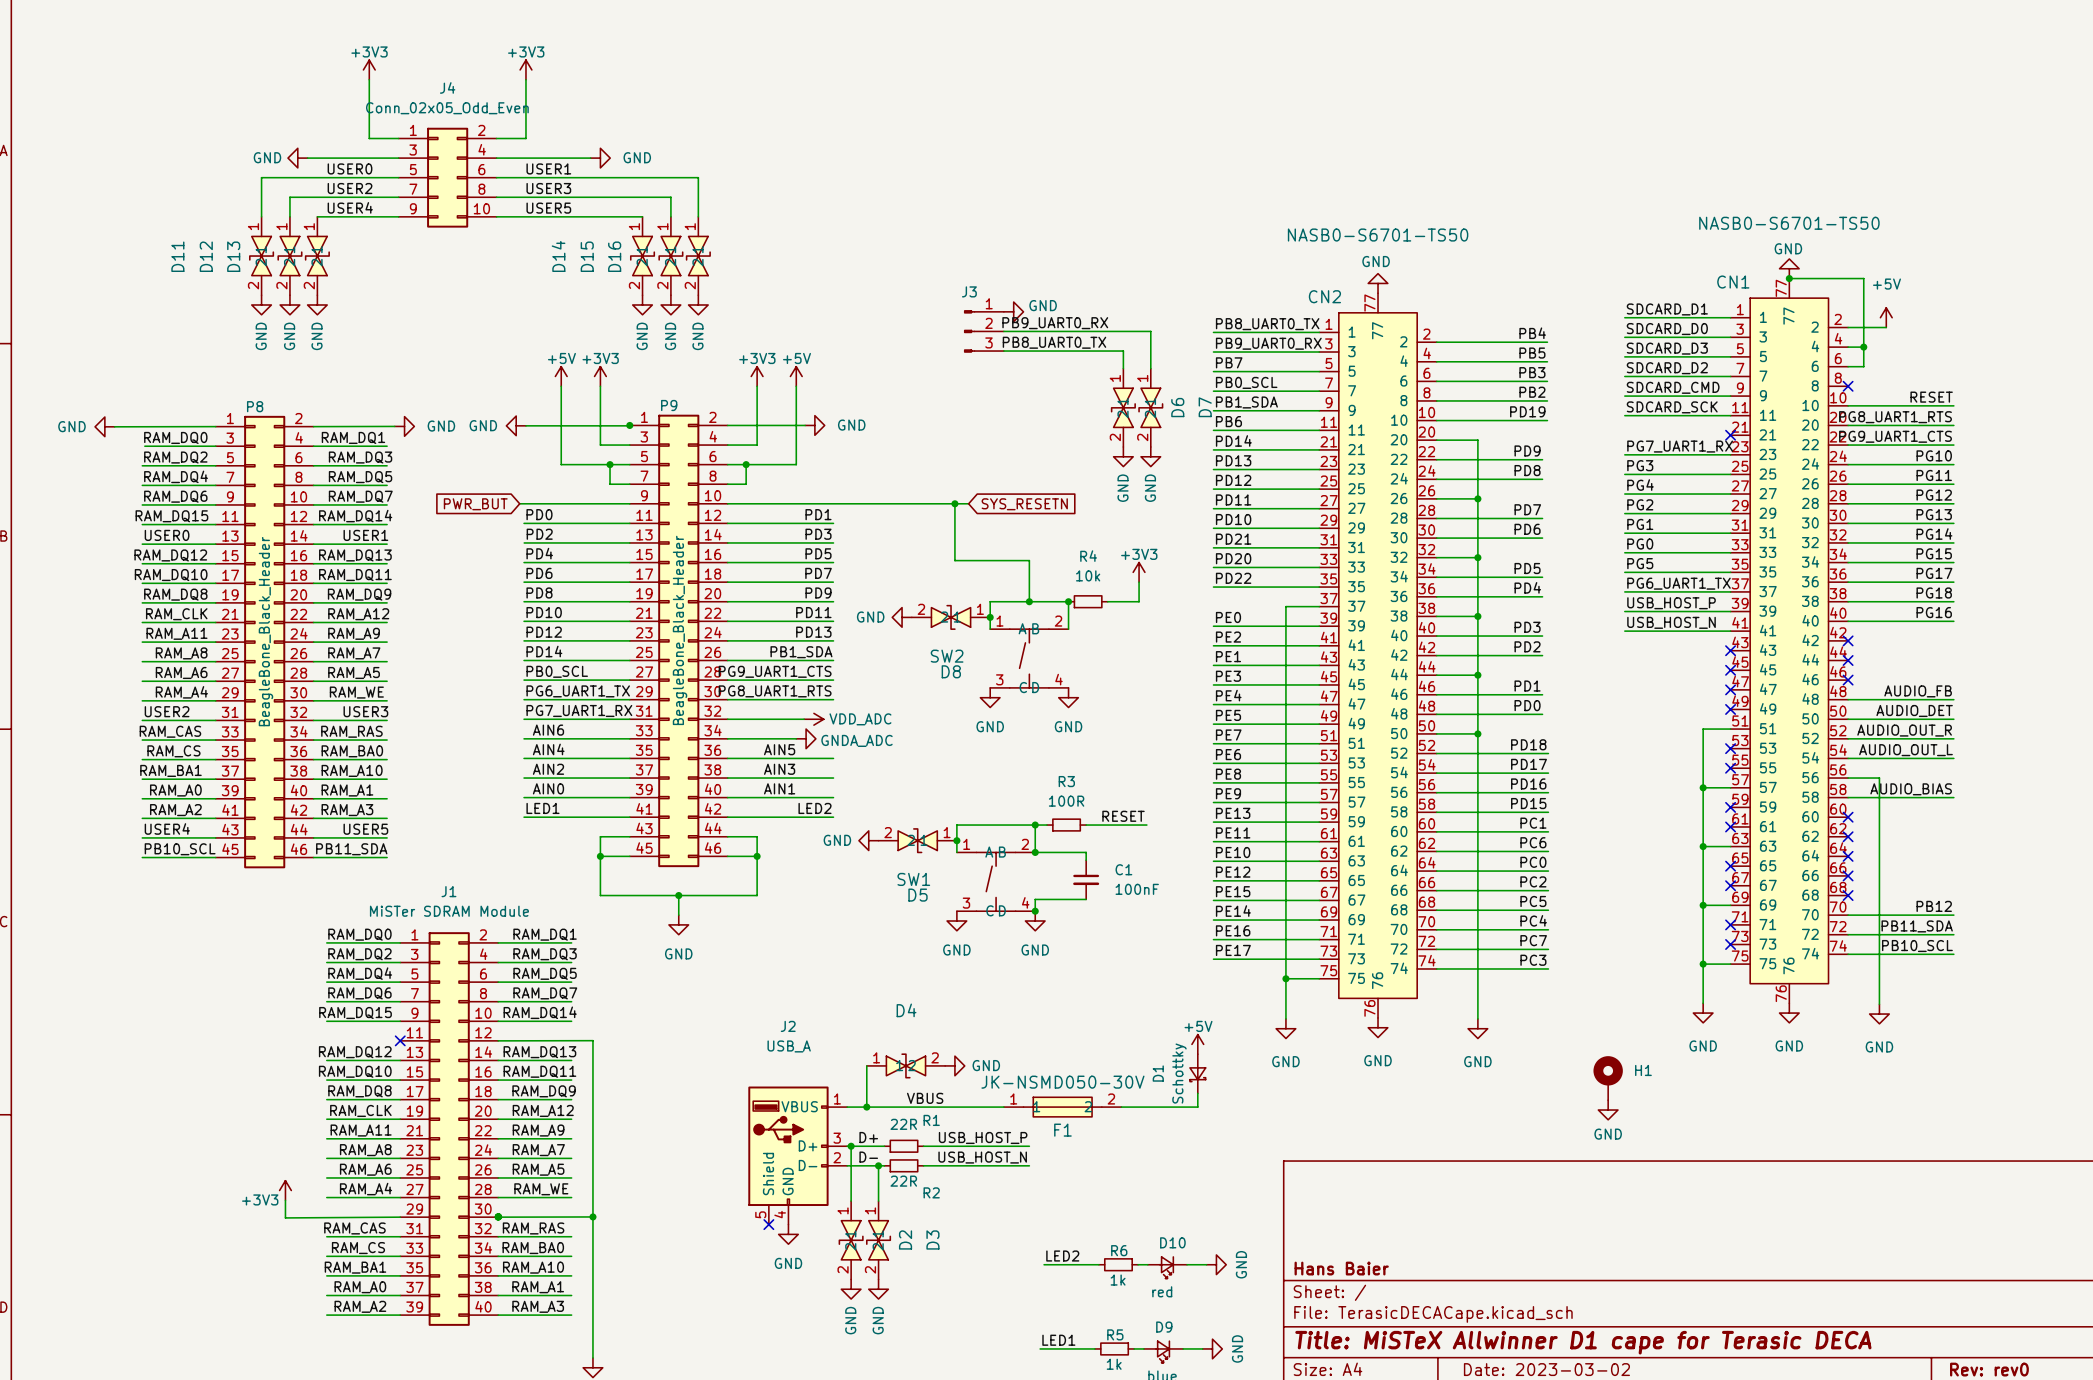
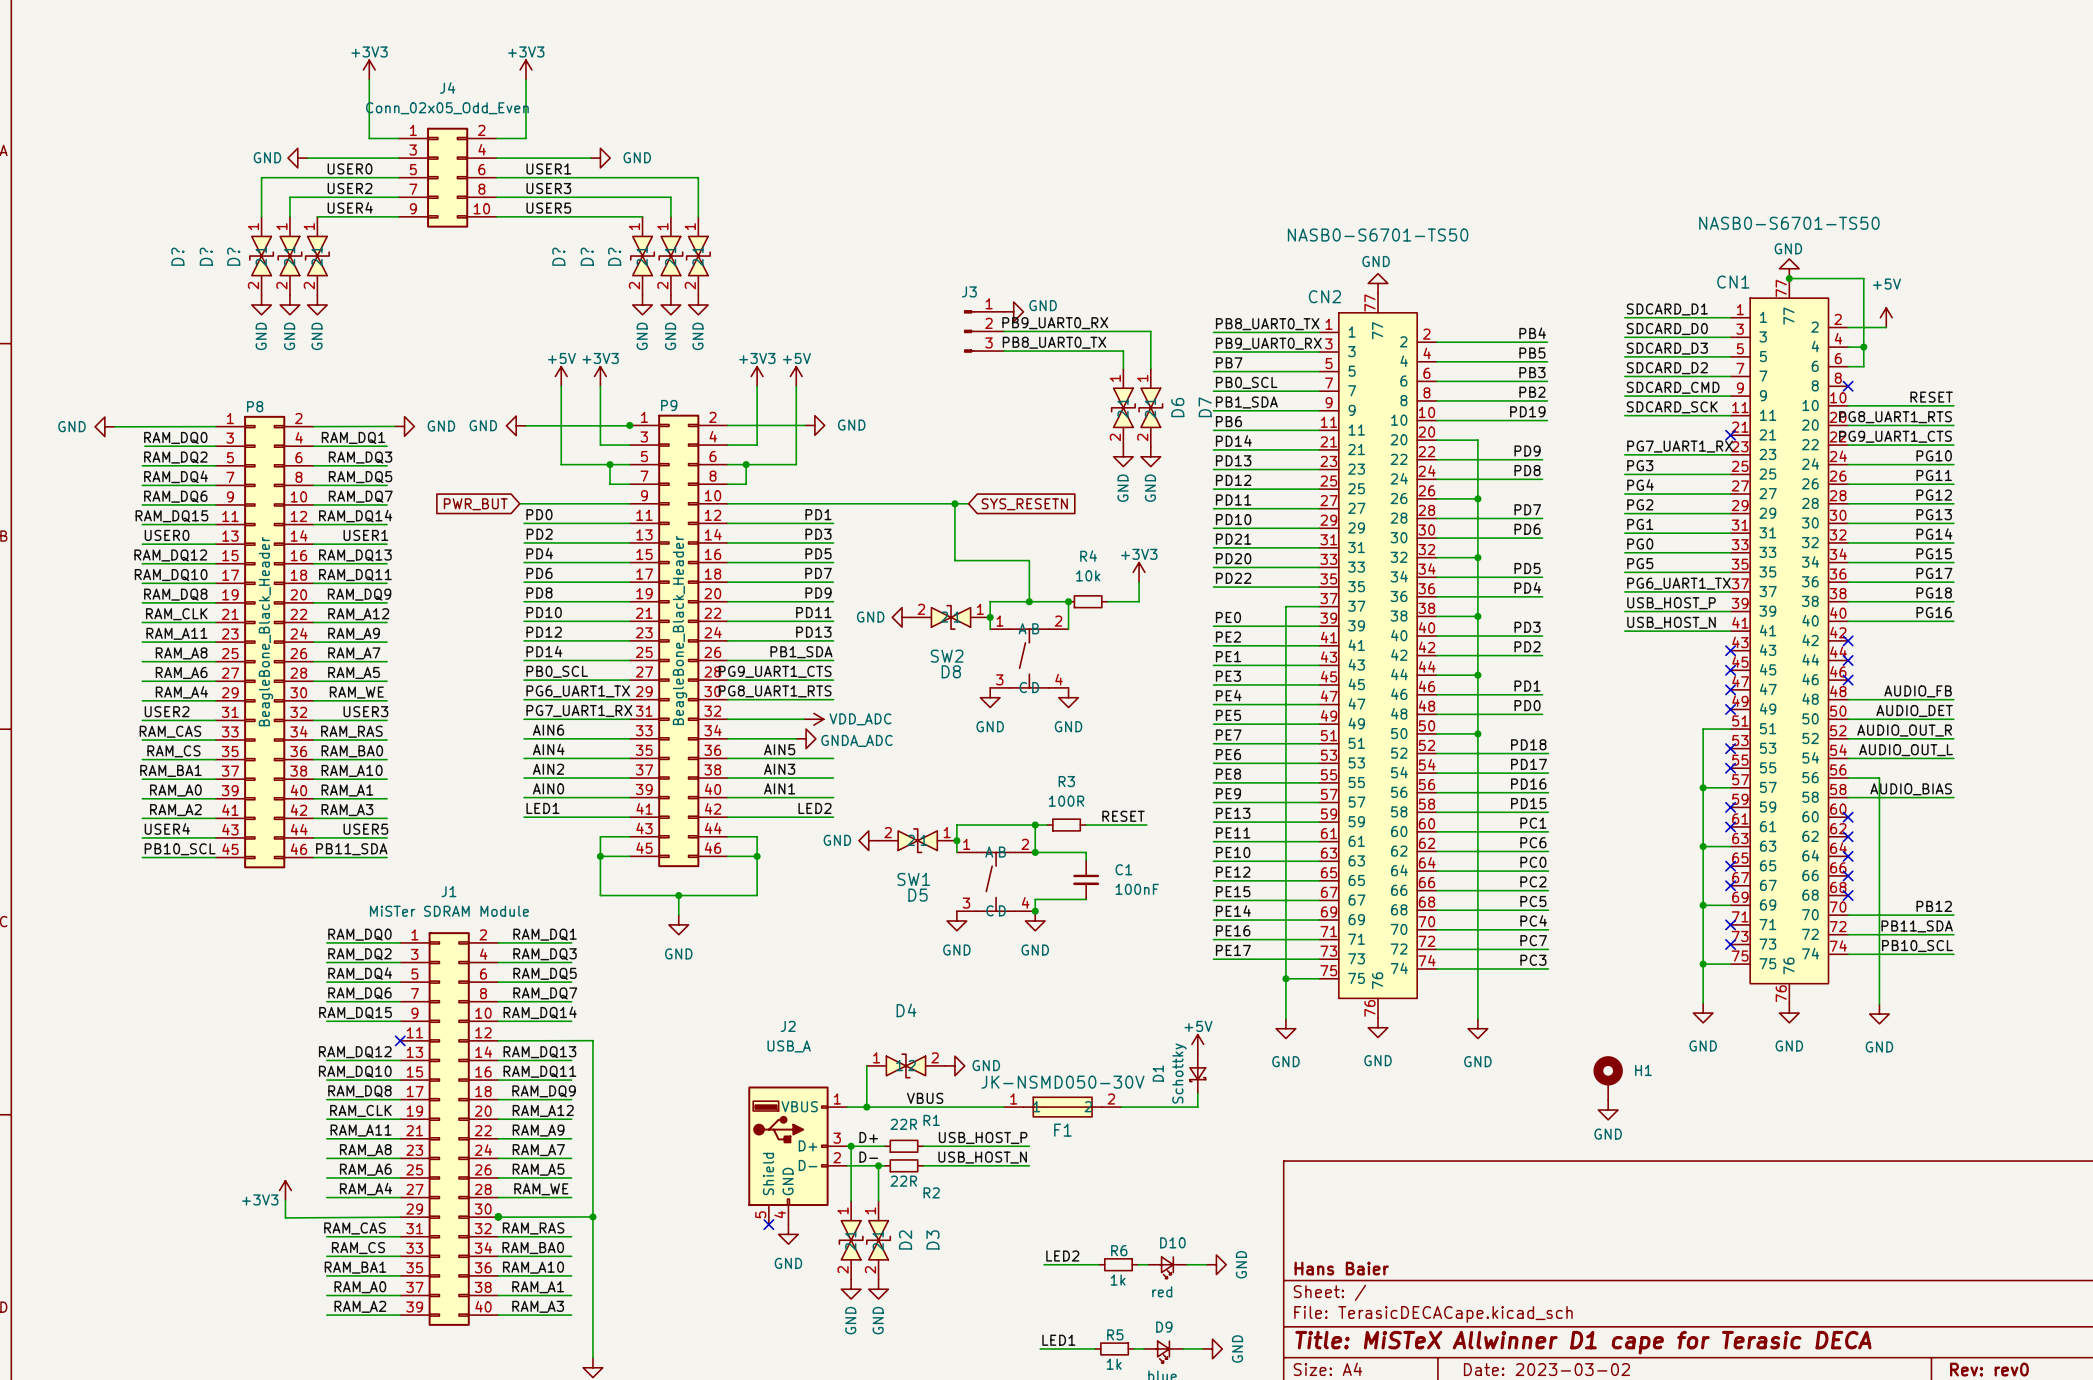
D11 name: D11 (177, 256) -> D? (177, 256)
D12 name: D12 (206, 256) -> D? (206, 256)
D13 name: D13 (233, 256) -> D? (233, 256)
D14 name: D14 (558, 256) -> D? (558, 256)
D15 name: D15 (587, 256) -> D? (587, 256)
D16 name: D16 (614, 256) -> D? (614, 256)

